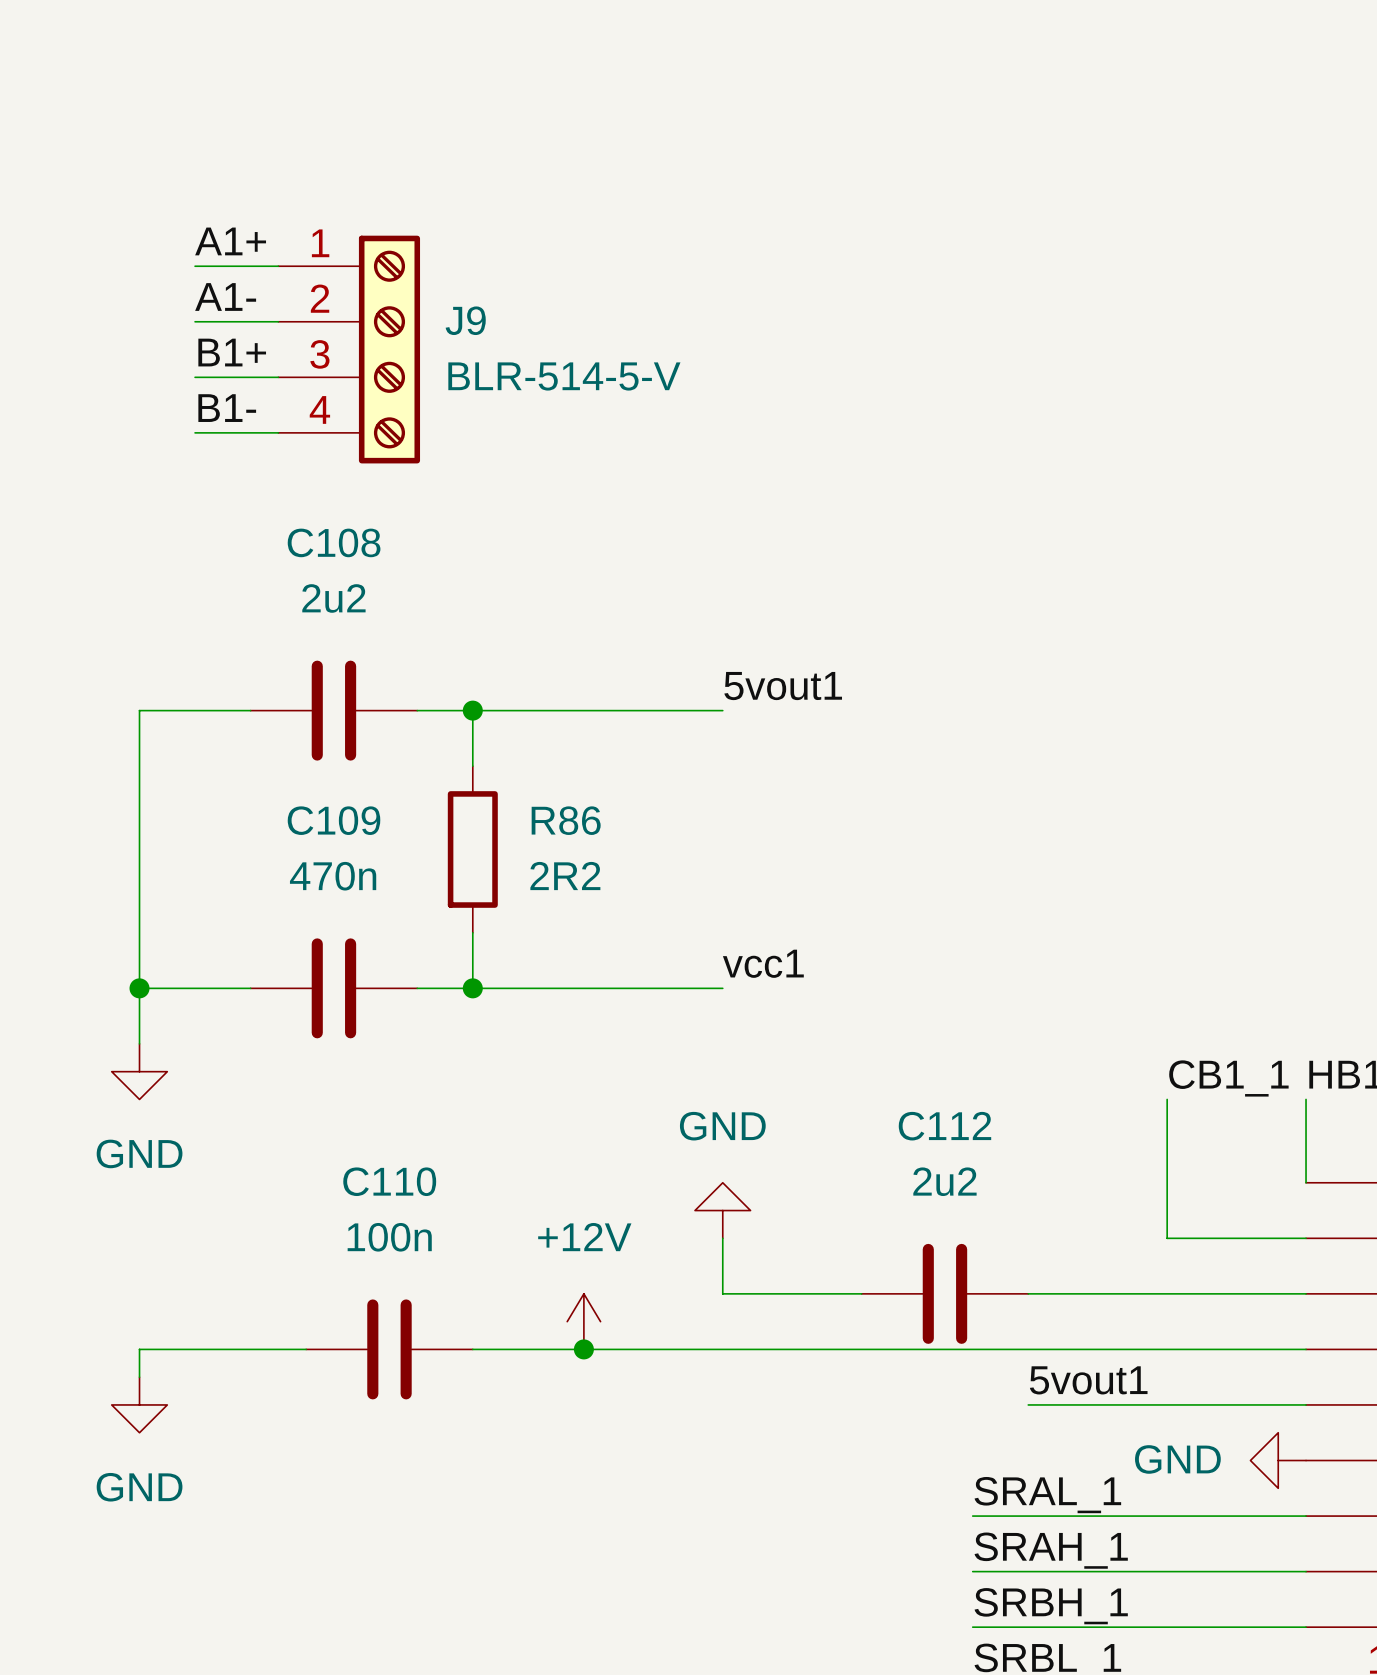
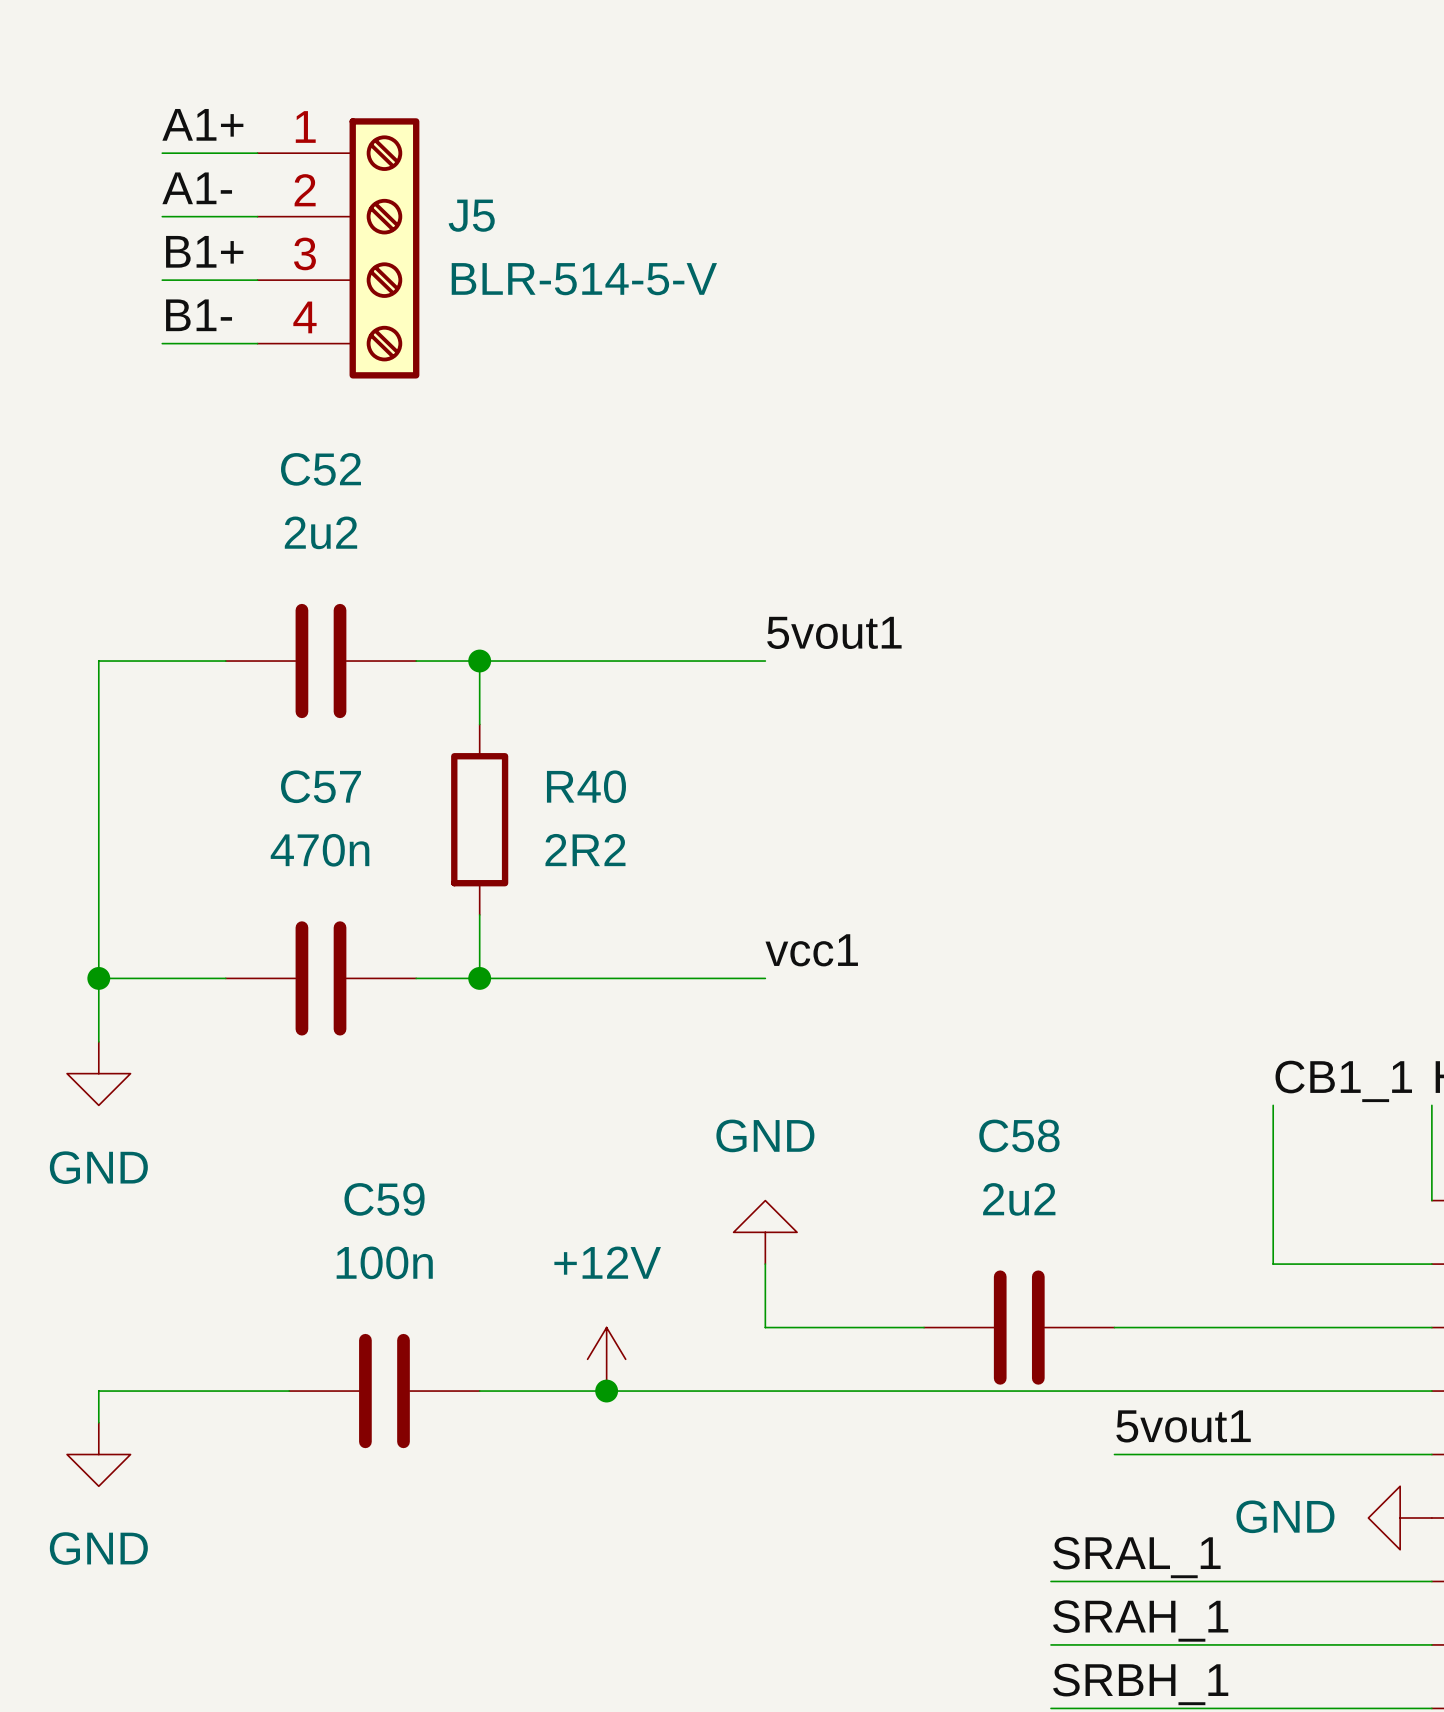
J9 name: J9 (465, 320) -> J5 (471, 215)
C108 name: C108 (334, 542) -> C52 (320, 469)
C109 name: C109 (334, 820) -> C57 (320, 786)
R86 name: R86 (566, 820) -> R40 (586, 786)
C112 name: C112 (944, 1126) -> C58 (1019, 1135)
C110 name: C110 (389, 1181) -> C59 (384, 1199)

